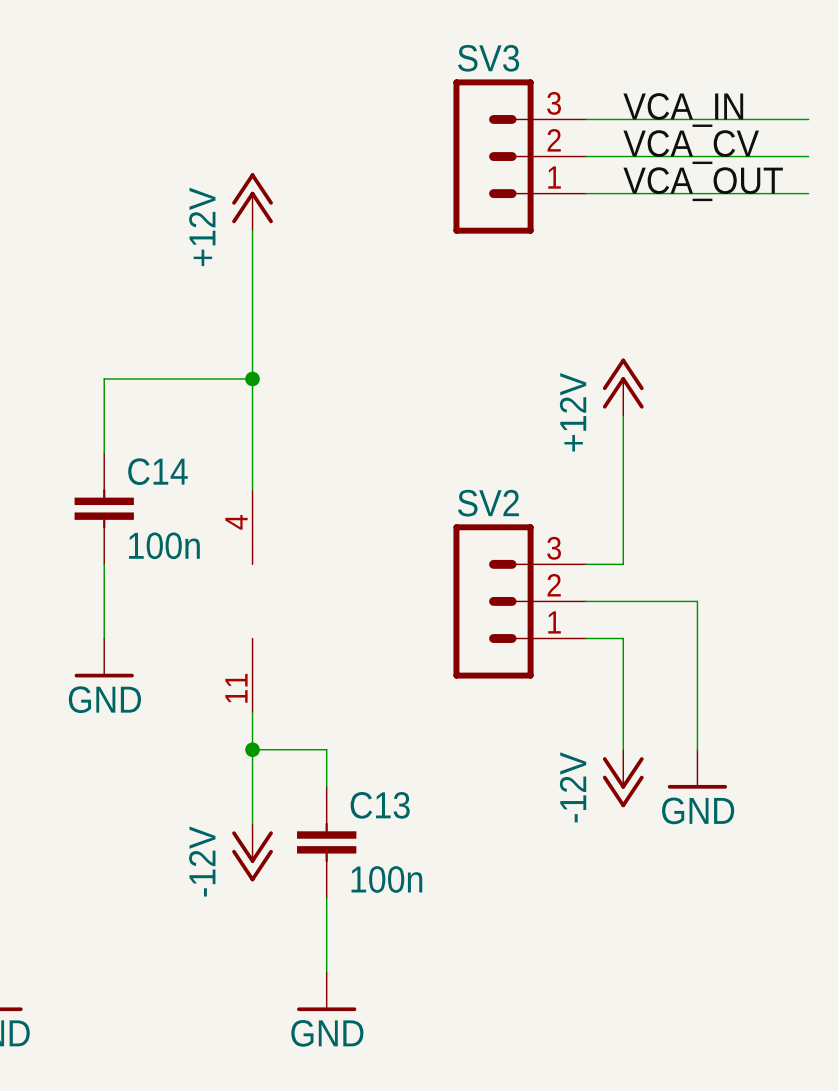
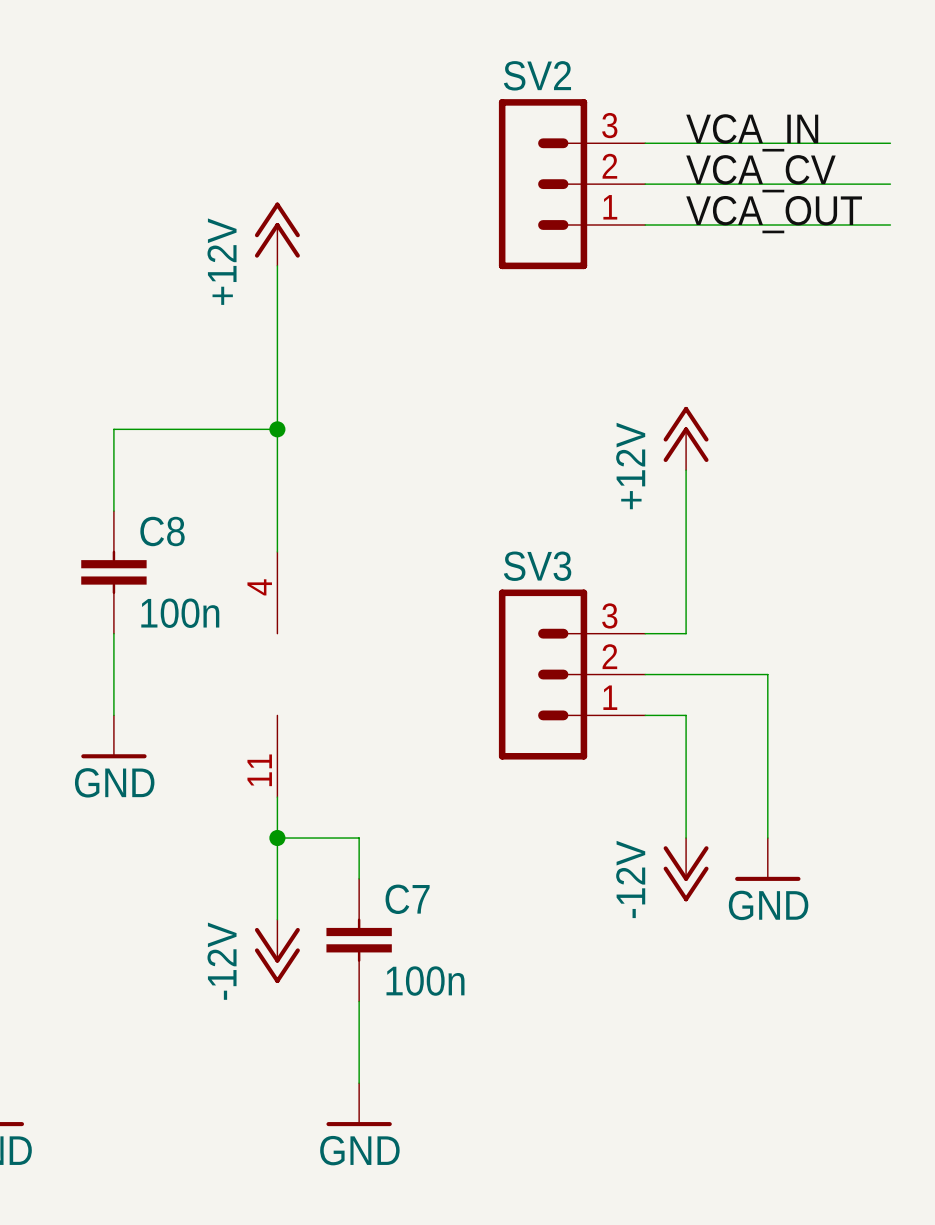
SV3 name: SV3 (488, 58) -> SV2 (537, 75)
C14 name: C14 (157, 471) -> C8 (162, 531)
SV2 name: SV2 (488, 503) -> SV3 (537, 566)
C13 name: C13 (380, 805) -> C7 (407, 899)

